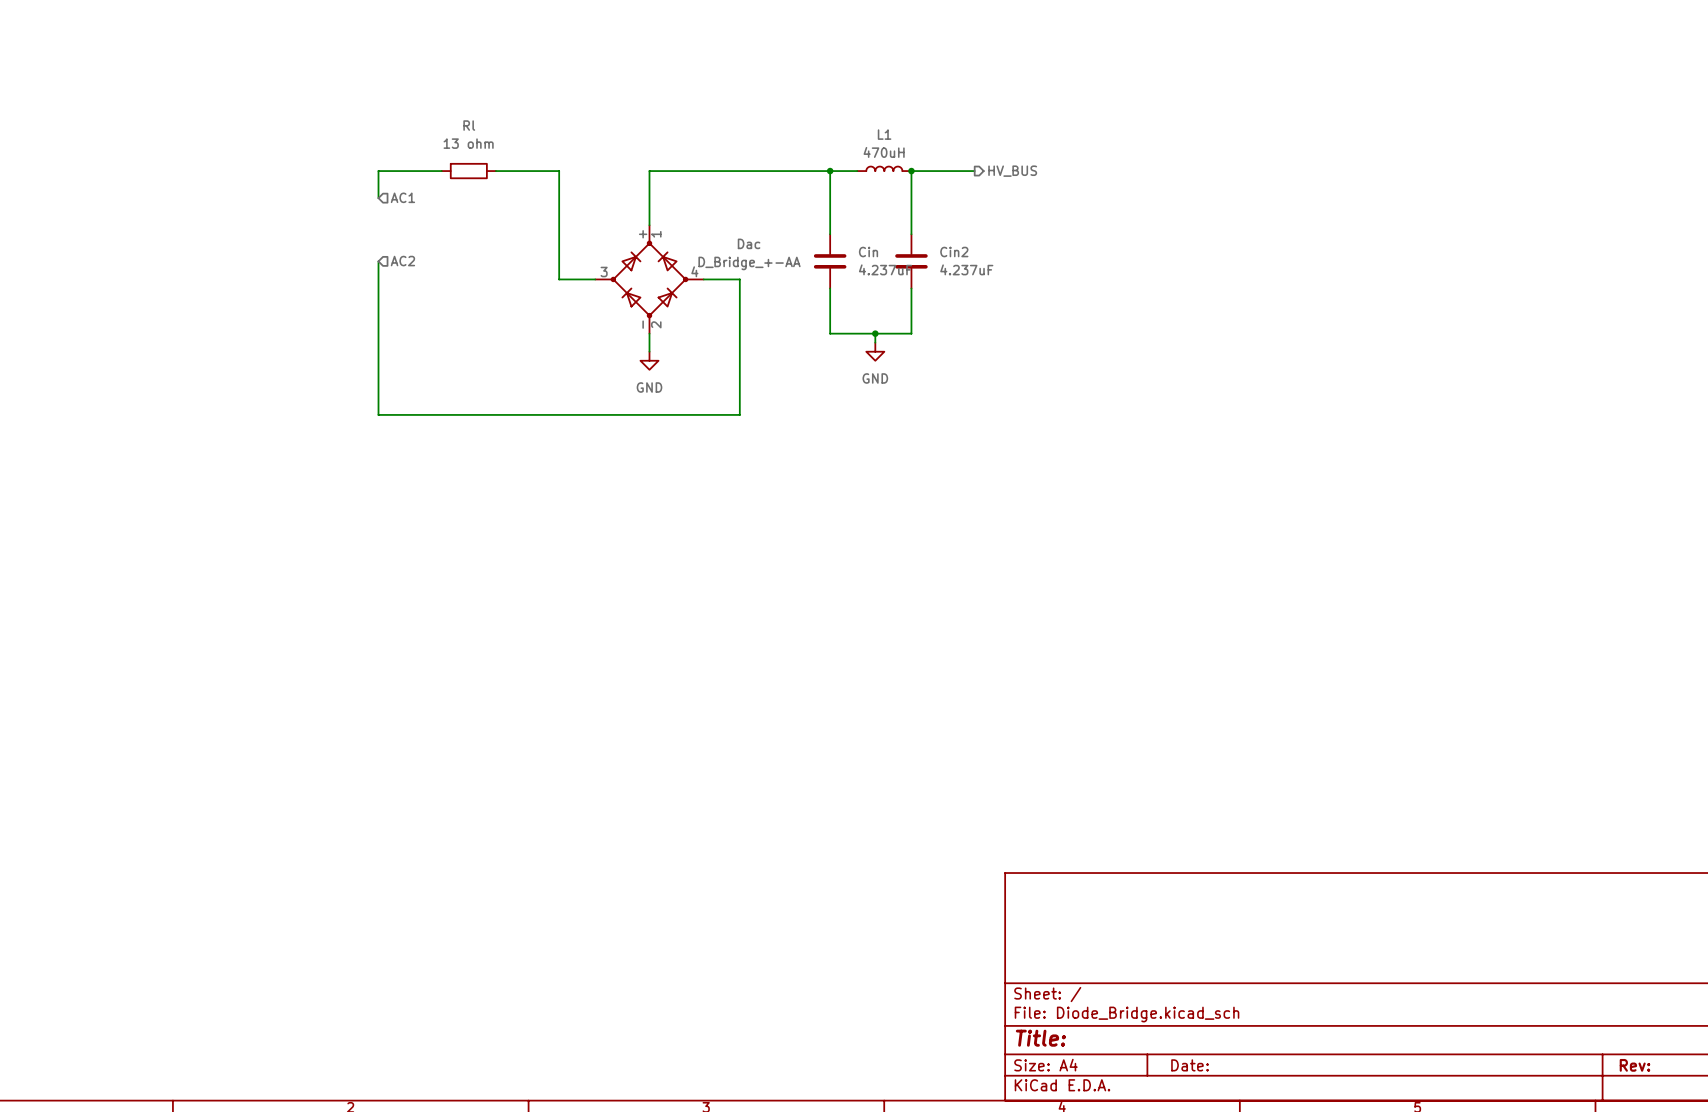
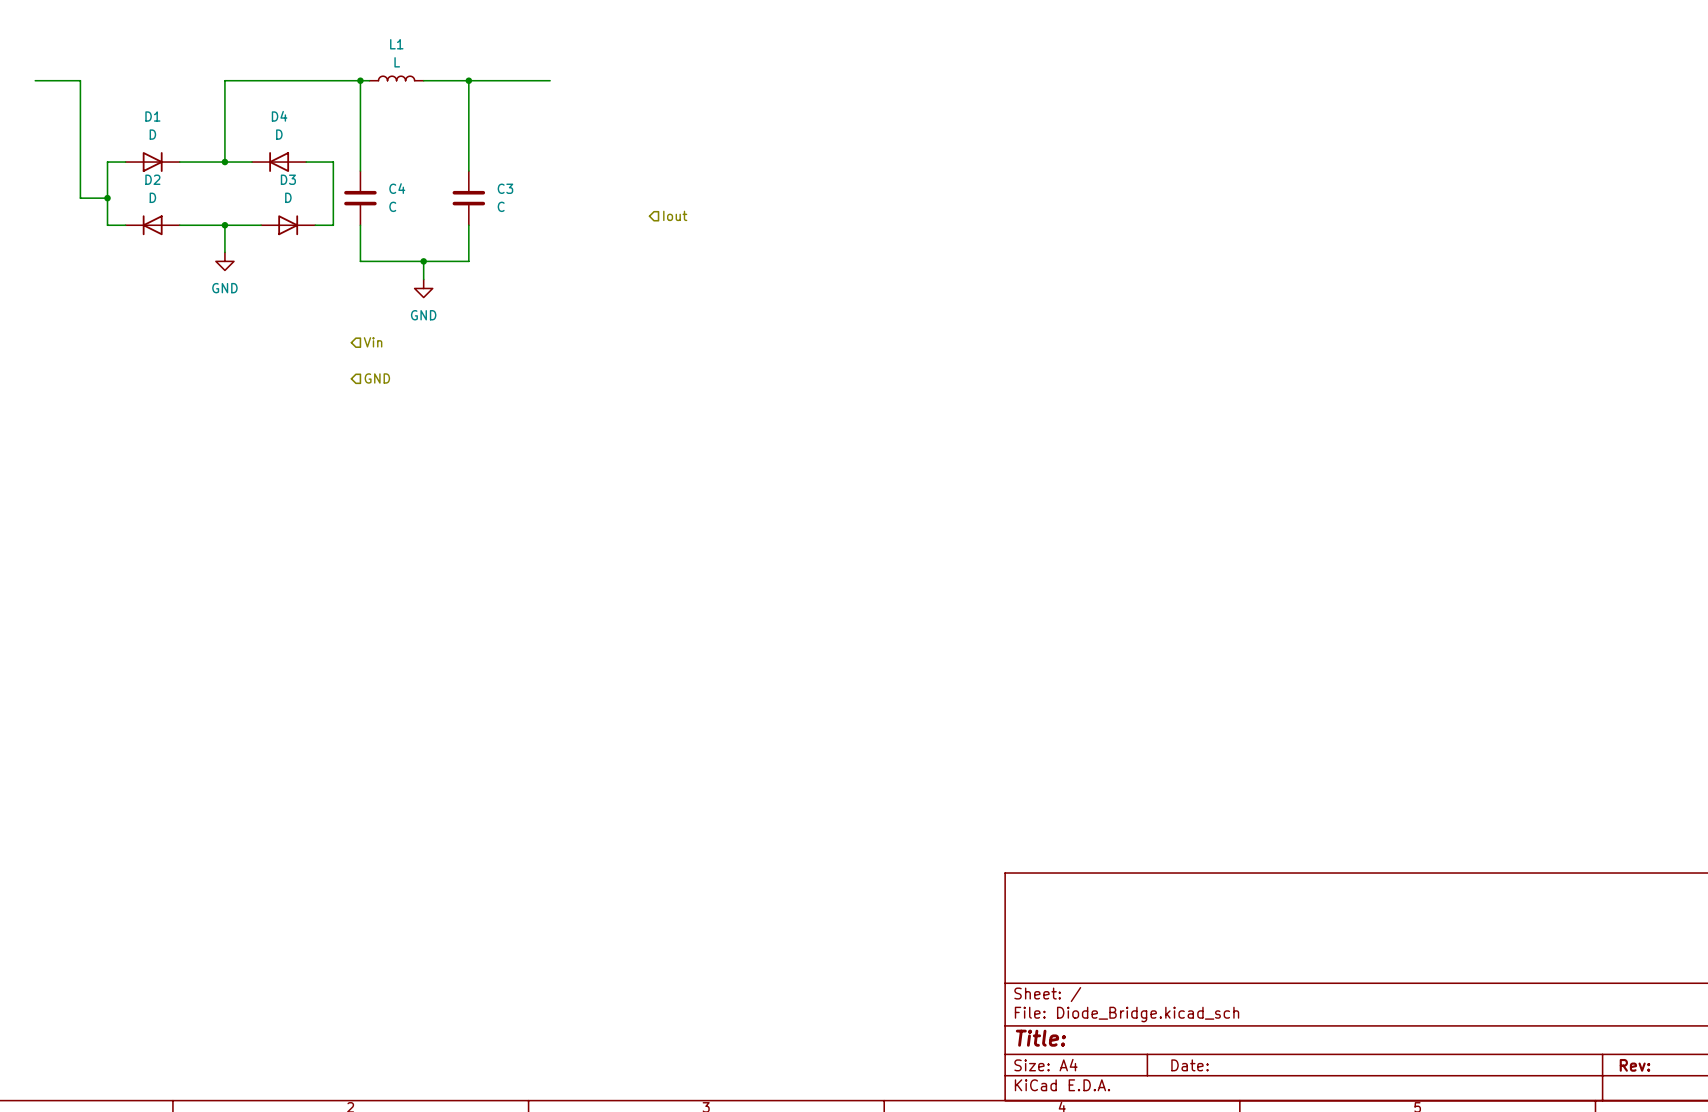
wire: none -> (35, 80) (80, 80) (80, 198) (107, 198)
wire: none -> (360, 80) (360, 171)
junction: none -> (360, 80)
wire: none -> (369, 80) (224, 80) (224, 162)
wire: none -> (423, 80) (550, 80)
wire: none -> (468, 80) (468, 171)
junction: none -> (468, 80)
L1 value: 470uH (884, 152) -> L (397, 62)
wire: none -> (125, 162) (107, 162) (107, 225) (125, 225)
D1: none -> D (152, 162)
wire: none -> (179, 162) (252, 162)
junction: none -> (224, 162)
D4: none -> D (279, 162)
wire: none -> (306, 162) (333, 162) (333, 225) (315, 225)
L1 position: (884, 168) -> (396, 78)
wire: (441, 171) (378, 171) (378, 198) -> none
Rl: 13 ohm (468, 171) -> none
wire: (495, 171) (559, 171) (559, 279) (595, 279) -> none
wire: (830, 171) (830, 234) -> none
junction: (830, 171) -> none
wire: (857, 171) (649, 171) (649, 225) -> none
junction: (911, 171) -> none
wire: (974, 171) (911, 171) (911, 234) -> none
hierarchical label: HV_BUS (1012, 171) -> none
hierarchical label: AC1 (402, 197) -> none
junction: none -> (107, 198)
C4: none -> C (360, 198)
C3: none -> C (468, 198)
hierarchical label: none -> Iout (675, 215)
D2: none -> D (152, 225)
wire: none -> (179, 225) (261, 225)
wire: none -> (224, 225) (224, 252)
junction: none -> (224, 225)
D3: none -> D (288, 225)
wire: none -> (360, 225) (360, 261) (468, 261) (468, 225)
power symbol: none -> GND (224, 261)
wire: (378, 261) (378, 414) (739, 414) (739, 279) (703, 279) -> none
hierarchical label: AC2 (402, 261) -> none
wire: none -> (423, 261) (423, 279)
junction: none -> (423, 261)
Cin: 4.237uF (830, 261) -> none
Cin2: 4.237uF (911, 261) -> none
Dac: D_Bridge_+-AA (649, 279) -> none
power symbol: none -> GND (423, 288)
wire: (830, 288) (830, 333) (911, 333) (911, 288) -> none
wire: (649, 333) (649, 351) -> none
wire: (875, 333) (875, 342) -> none
junction: (875, 333) -> none
hierarchical label: none -> Vin (373, 342)
power symbol: GND (875, 351) -> none
power symbol: GND (649, 360) -> none
hierarchical label: none -> GND (377, 378)

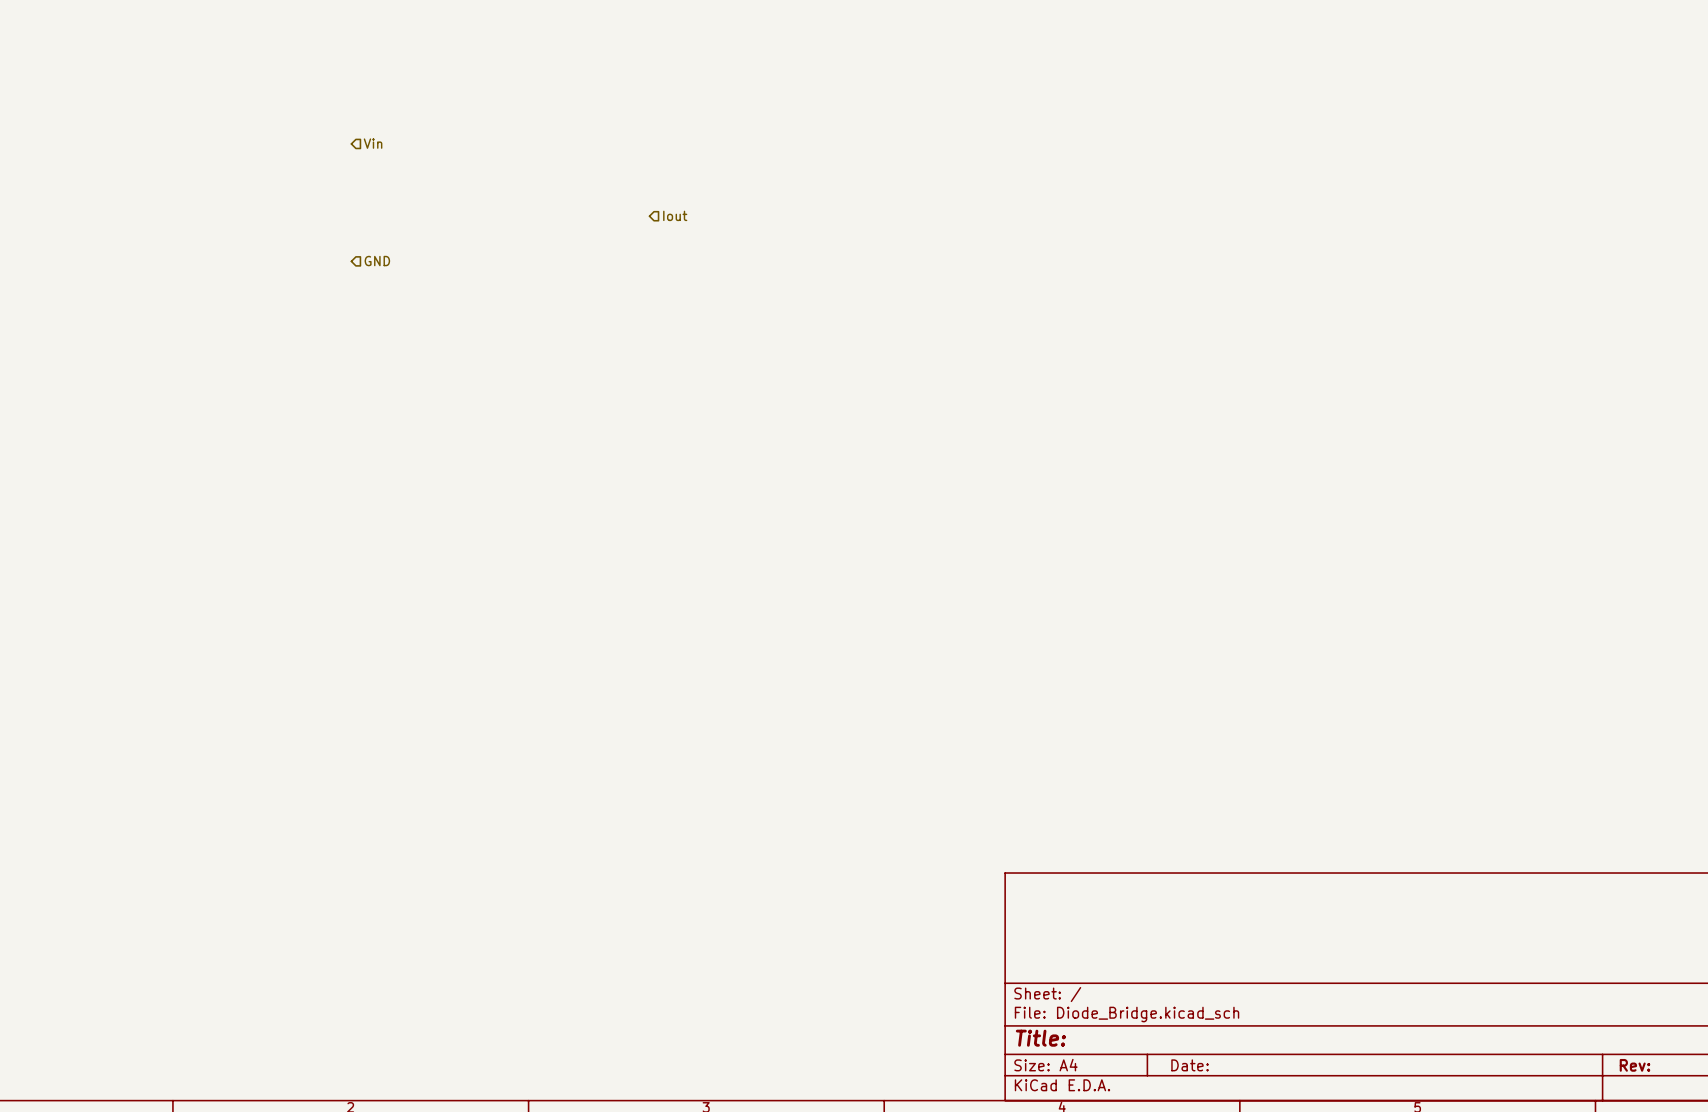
L1: L (396, 78) -> none
wire: (35, 80) (80, 80) (80, 198) (107, 198) -> none
wire: (360, 80) (360, 171) -> none
junction: (360, 80) -> none
wire: (369, 80) (224, 80) (224, 162) -> none
wire: (423, 80) (550, 80) -> none
wire: (468, 80) (468, 171) -> none
junction: (468, 80) -> none
hierarchical label: none -> Vin (373, 143)
wire: (125, 162) (107, 162) (107, 225) (125, 225) -> none
D1: D (152, 162) -> none
wire: (179, 162) (252, 162) -> none
junction: (224, 162) -> none
D4: D (279, 162) -> none
wire: (306, 162) (333, 162) (333, 225) (315, 225) -> none
junction: (107, 198) -> none
C4: C (360, 198) -> none
C3: C (468, 198) -> none
D2: D (152, 225) -> none
wire: (179, 225) (261, 225) -> none
wire: (224, 225) (224, 252) -> none
junction: (224, 225) -> none
D3: D (288, 225) -> none
wire: (360, 225) (360, 261) (468, 261) (468, 225) -> none
power symbol: GND (224, 261) -> none
wire: (423, 261) (423, 279) -> none
junction: (423, 261) -> none
power symbol: GND (423, 288) -> none
hierarchical label: Vin (373, 342) -> none
hierarchical label position: GND (377, 378) -> GND (377, 261)

